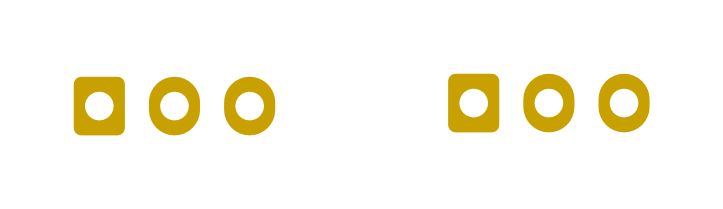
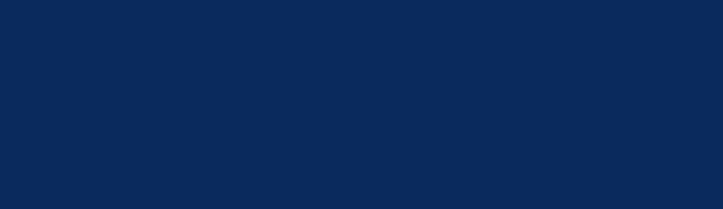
part: (548, 103) -> none
part: (174, 106) -> none

